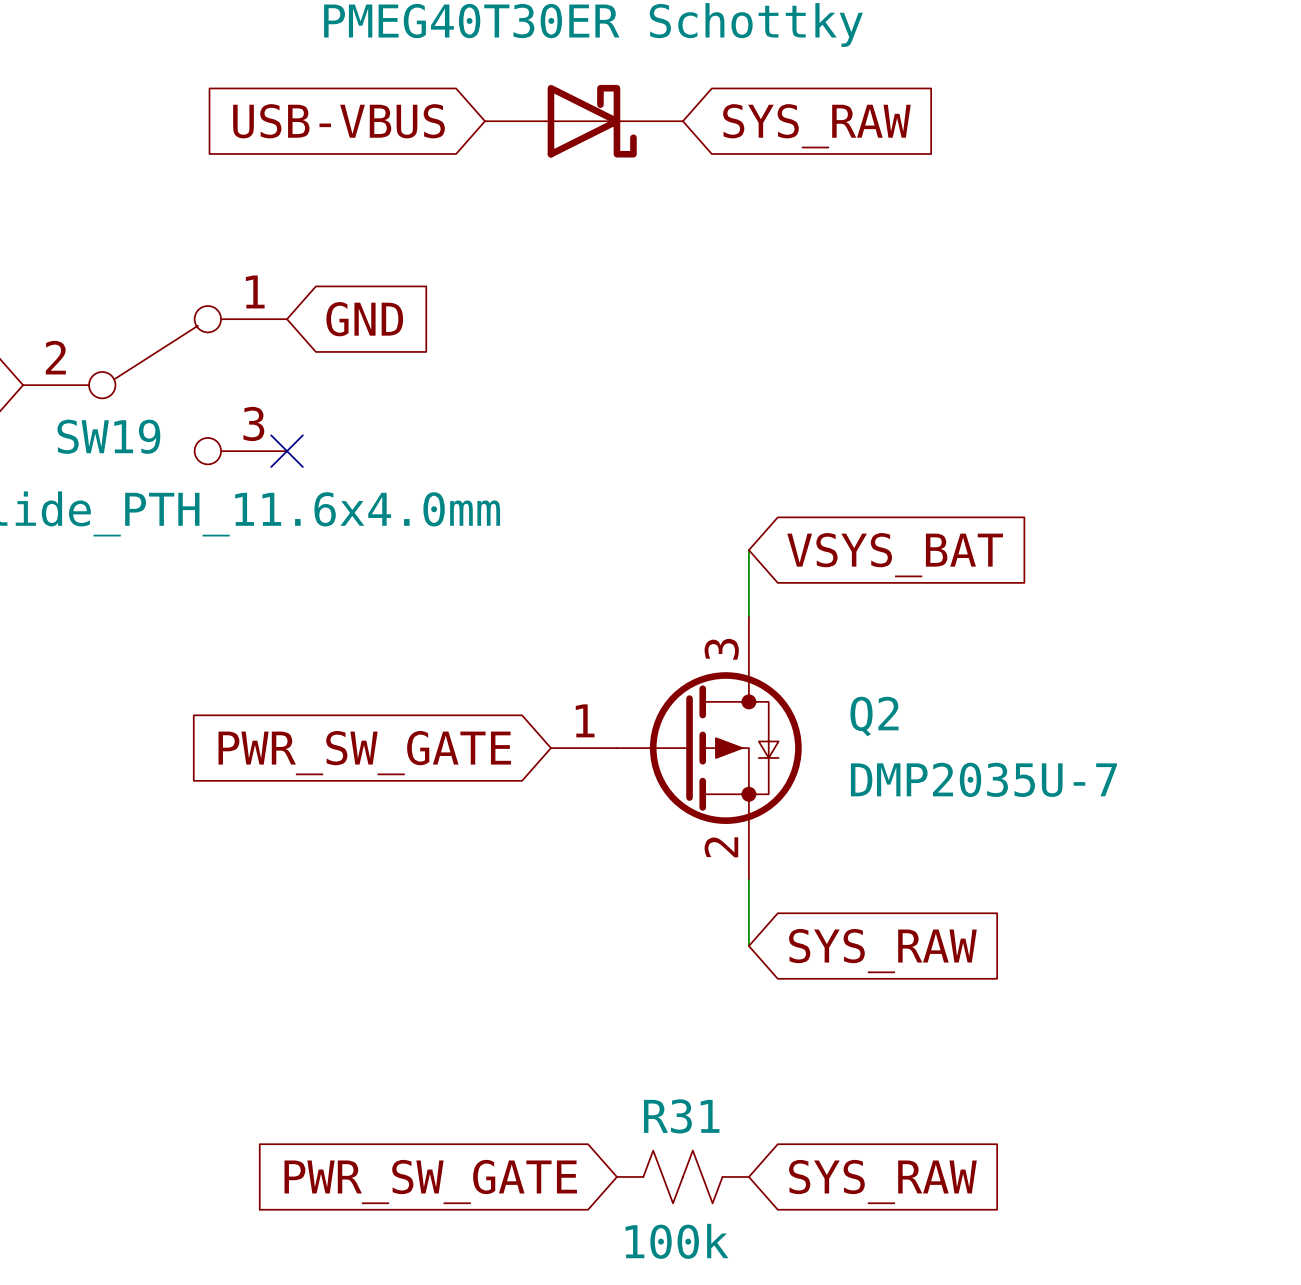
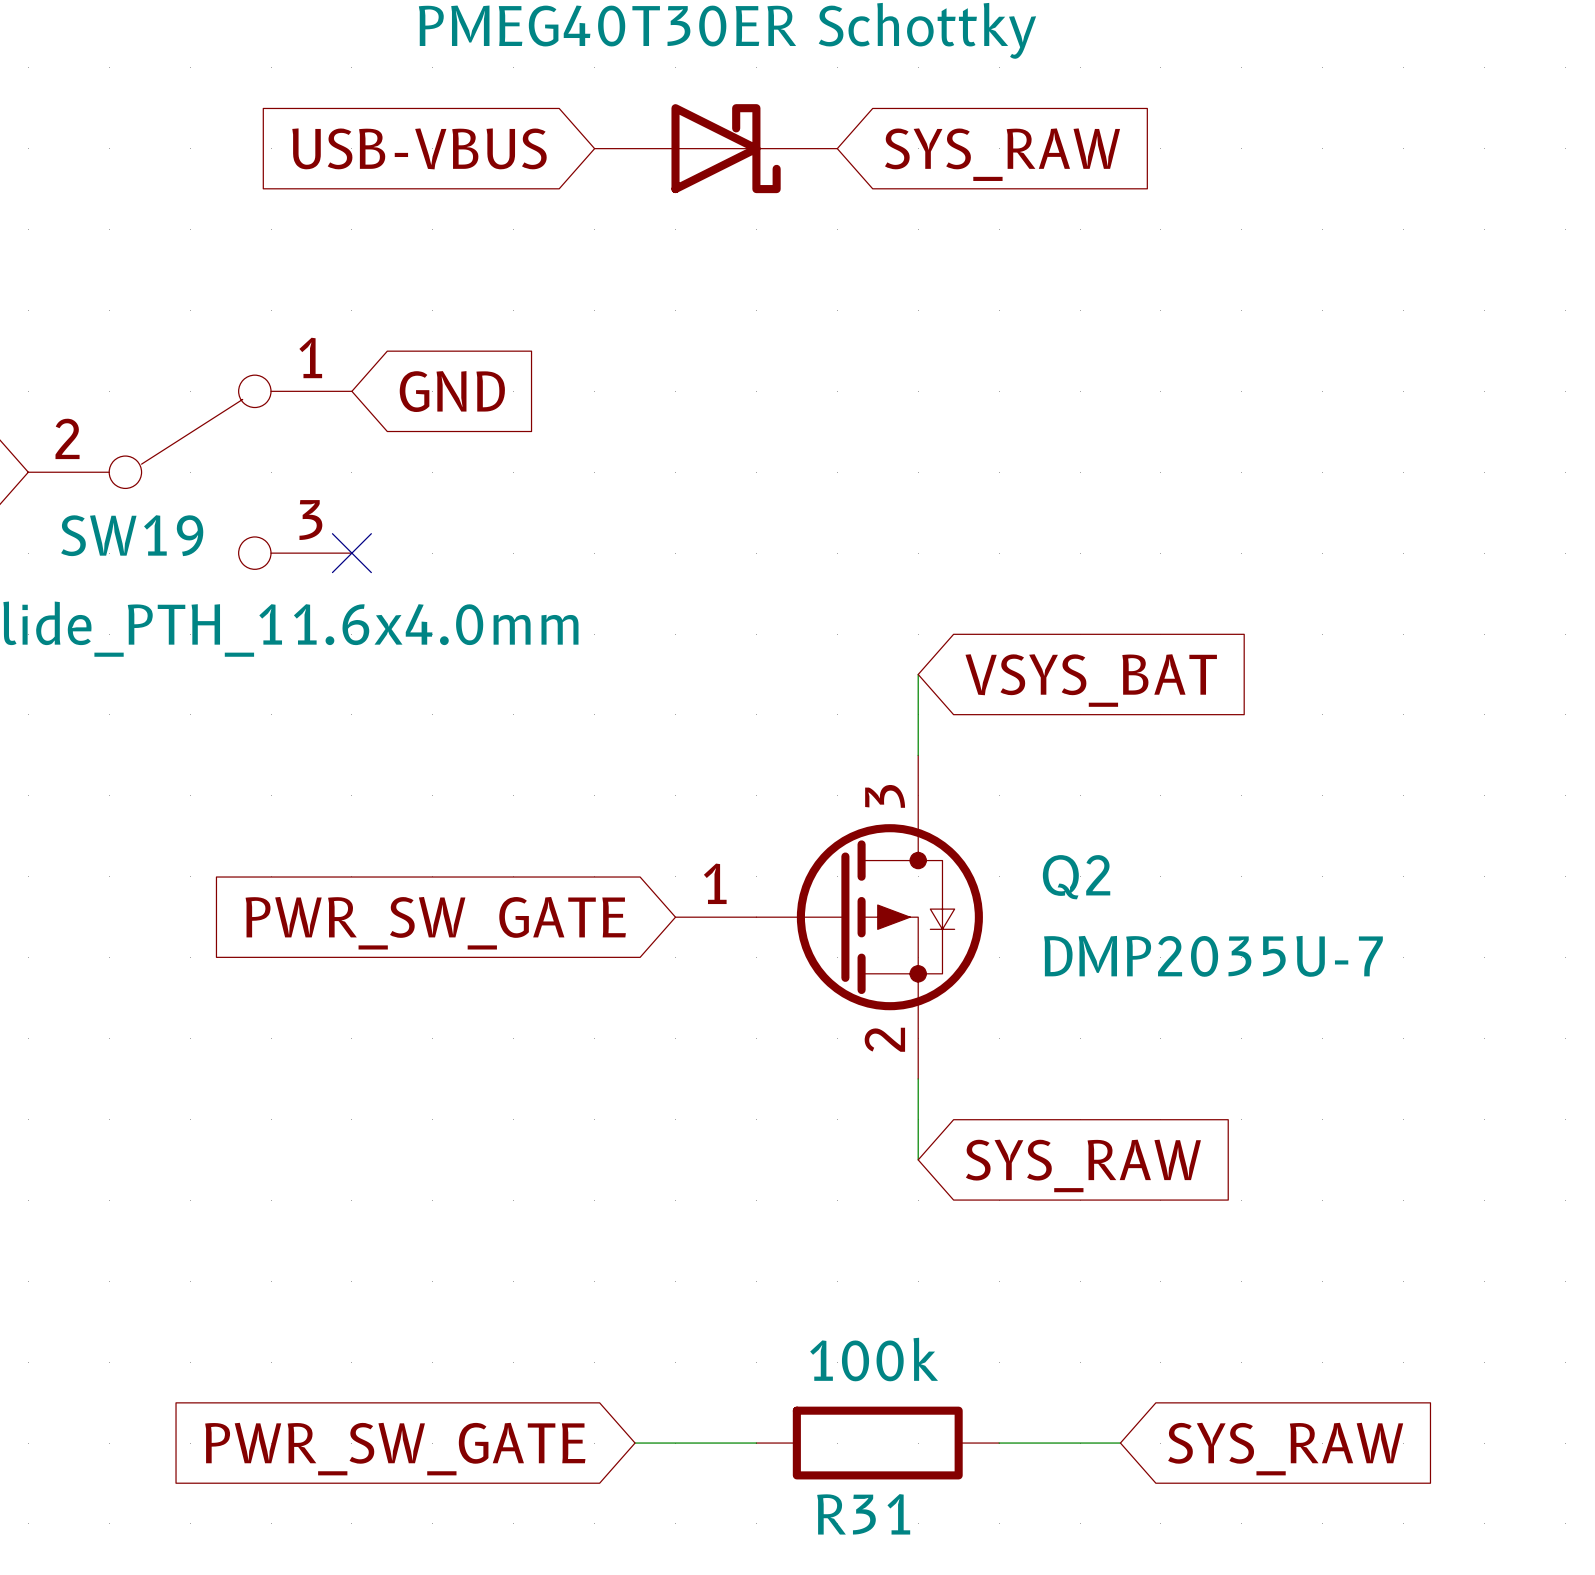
R31 name position: R31 (681, 1116) -> R31 (863, 1514)
R31 symbol: [616, 1150, 749, 1204] -> [756, 1406, 1000, 1480]
wire: none -> (635, 1443) (756, 1443)
wire: none -> (999, 1443) (1120, 1443)
global label position: PWR_SW_GATE (430, 1182) -> PWR_SW_GATE (395, 1449)
global label position: SYS_RAW (882, 1182) -> SYS_RAW (1285, 1449)
R31 value position: 100k (677, 1241) -> 100k (874, 1359)

